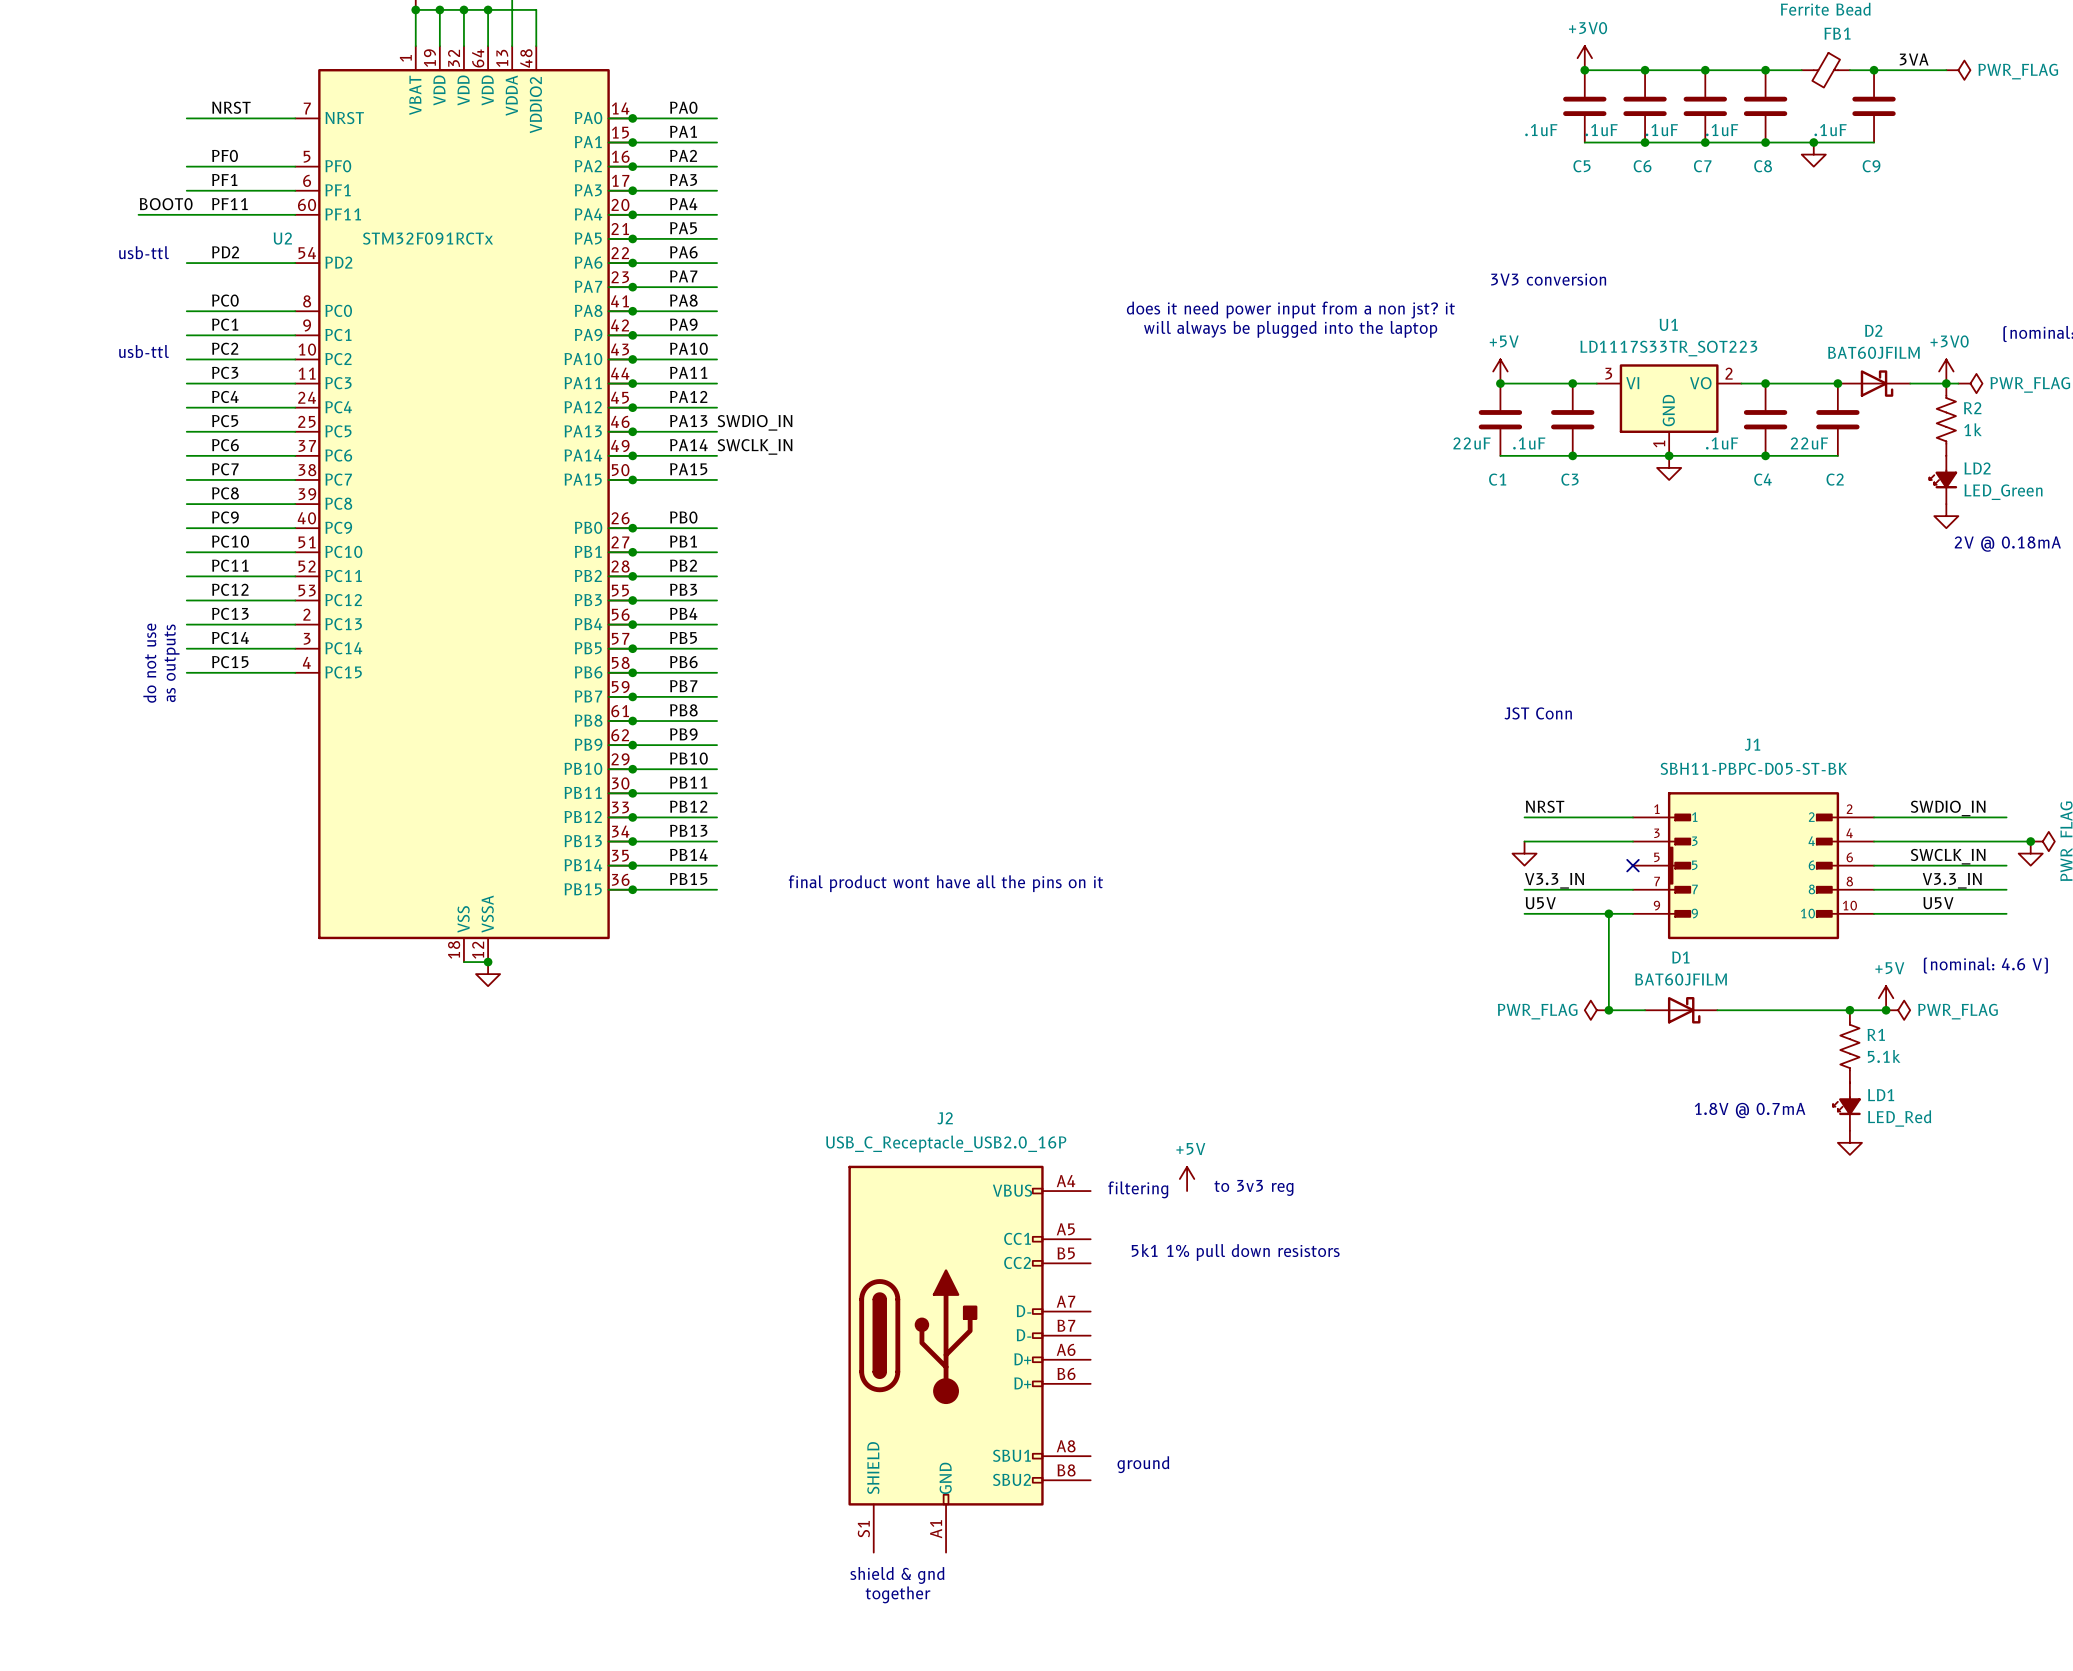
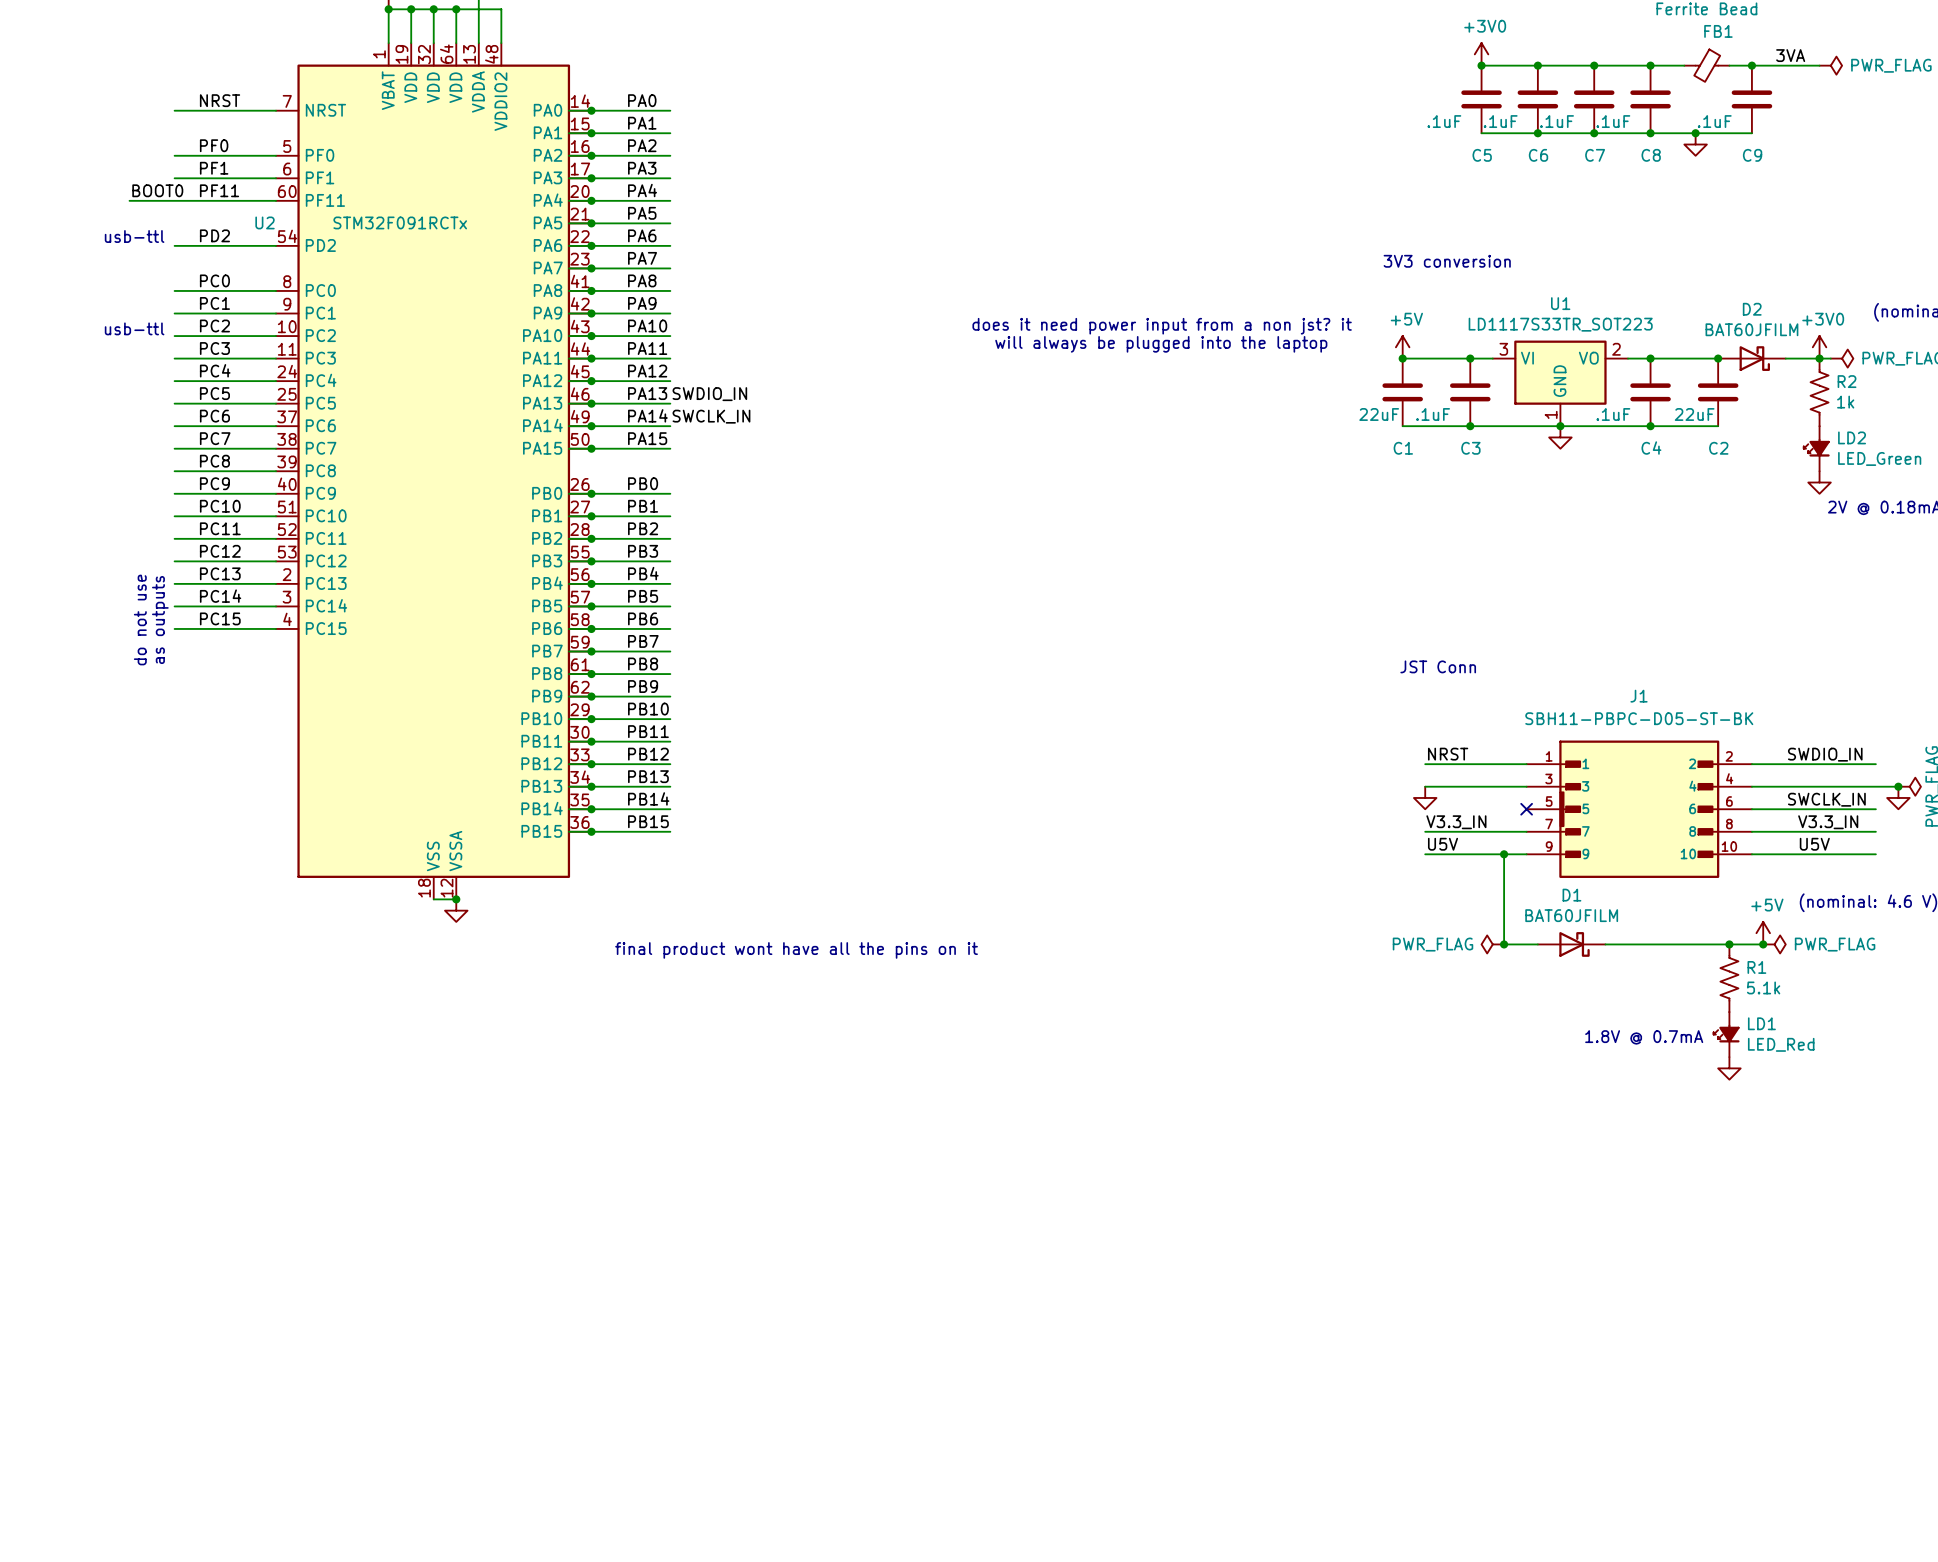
text position: does it need power input from a non jst? it (1290, 310) -> does it need power input from a non jst? it (1162, 326)
text position: will always be plugged into the laptop (1290, 329) -> will always be plugged into the laptop (1161, 344)
text position: final product wont have all the pins on it (945, 883) -> final product wont have all the pins on it (796, 950)
power symbol: +5V (1187, 1178) -> none
text: to 3v3 reg (1253, 1187) -> none
text: filtering (1138, 1189) -> none
text: 5k1 1% pull down resistors (1235, 1252) -> none
J2: USB_C_Receptacle_USB2.0_16P (969, 1359) -> none
text: ground (1143, 1464) -> none
text: shield & gnd (897, 1575) -> none
text: together (898, 1594) -> none

